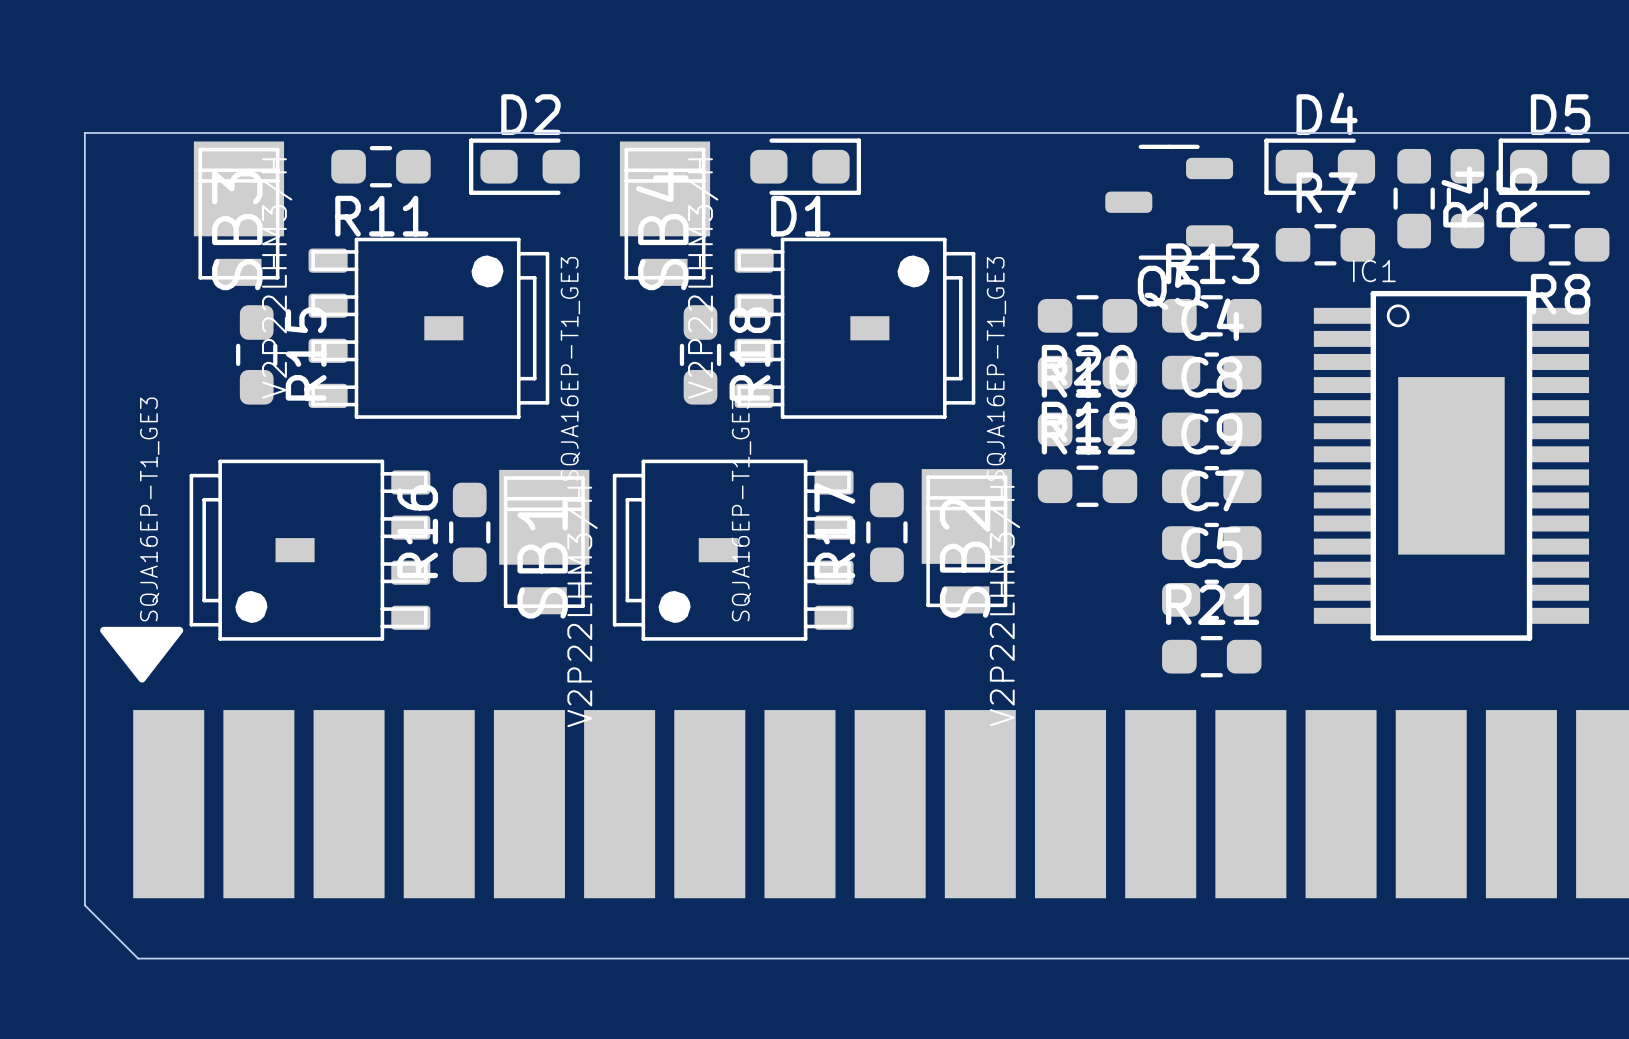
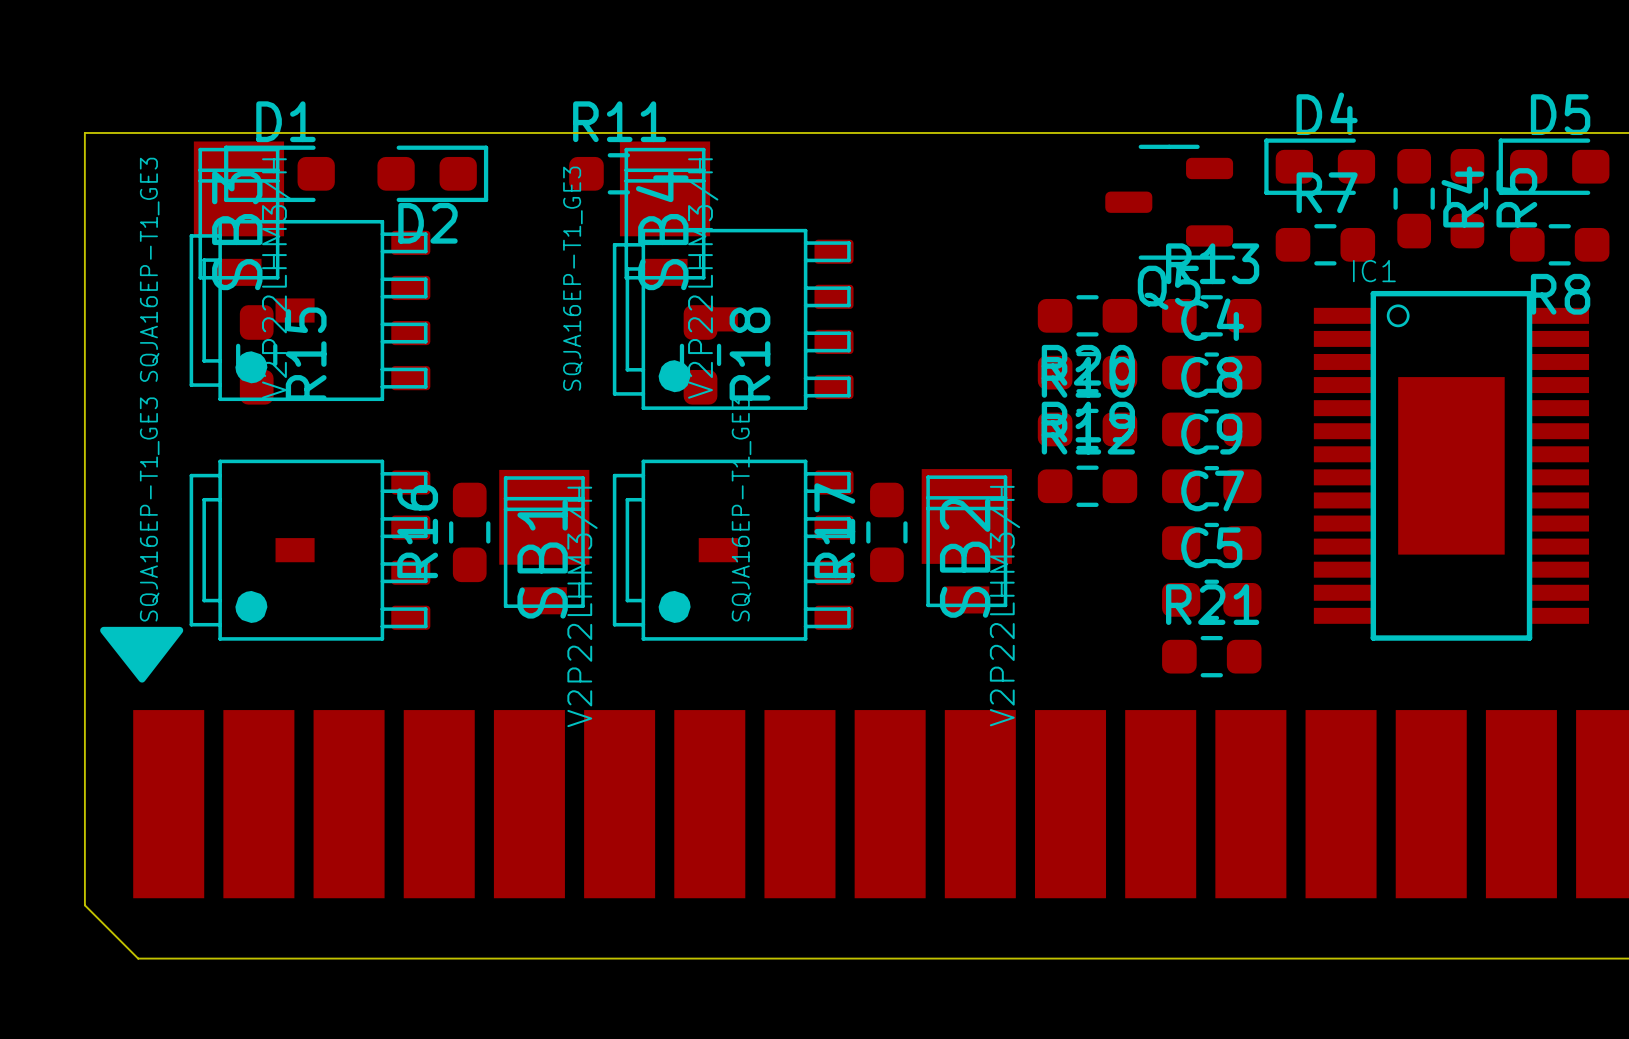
R11 position: (380, 166) -> (618, 173)
D2 rotation: 0° (524, 166) -> 180° (432, 173)
D2 position: (524, 166) -> (432, 173)
D1 rotation: 0° (805, 166) -> 180° (279, 173)
D1 position: (805, 166) -> (279, 173)
R11 name position: R11 (381, 216) -> R11 (619, 121)
part rotation: 0° (428, 328) -> 180° (309, 310)
part rotation: 0° (854, 328) -> 180° (733, 319)

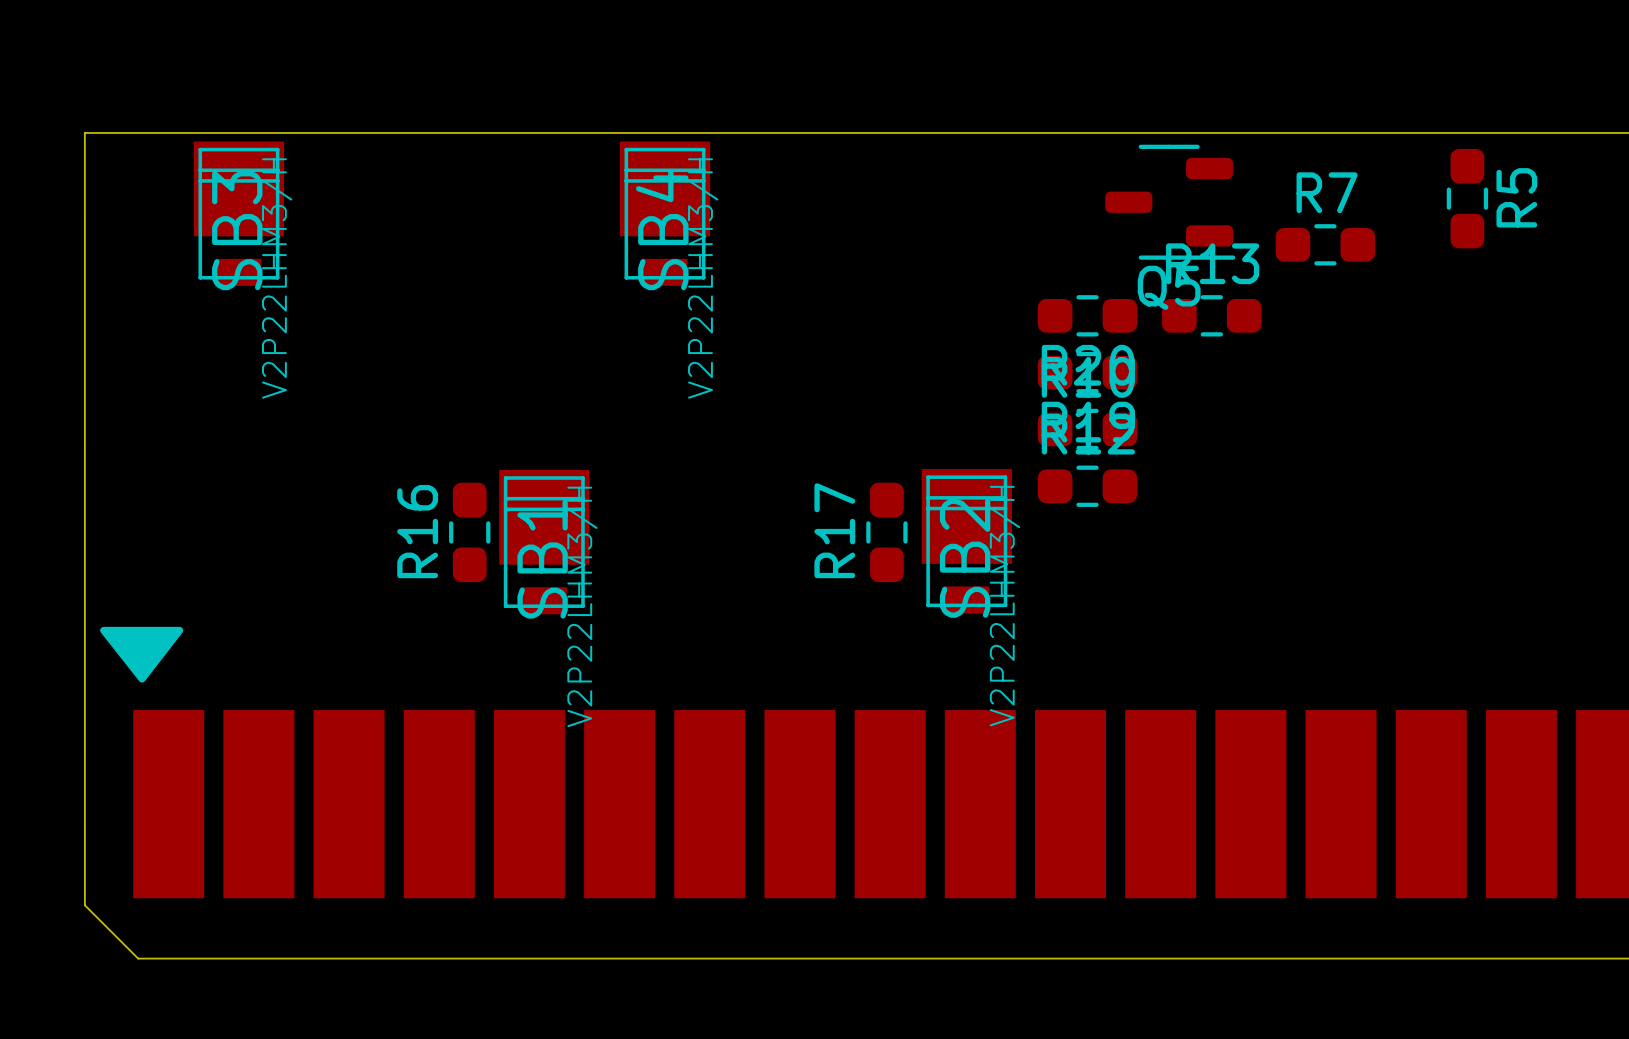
D4: (1319, 166) -> none
D5: (1554, 166) -> none
D1: (279, 173) -> none
D2: (432, 173) -> none
R11: (618, 173) -> none
R4: (1414, 198) -> none
R8: (1559, 244) -> none
part: SQJA16EP-T1_GE3 (309, 310) -> none
part: SQJA16EP-T1_GE3 (733, 319) -> none
R15: (256, 354) -> none
R18: (700, 354) -> none
C4: (1211, 372) -> none
C8: (1211, 429) -> none
IC1: (1451, 465) -> none
C9: (1211, 486) -> none
C7: (1211, 543) -> none
part: SQJA16EP-T1_GE3 (309, 550) -> none
part: SQJA16EP-T1_GE3 (733, 550) -> none
C5: (1211, 599) -> none
R21: (1211, 656) -> none

